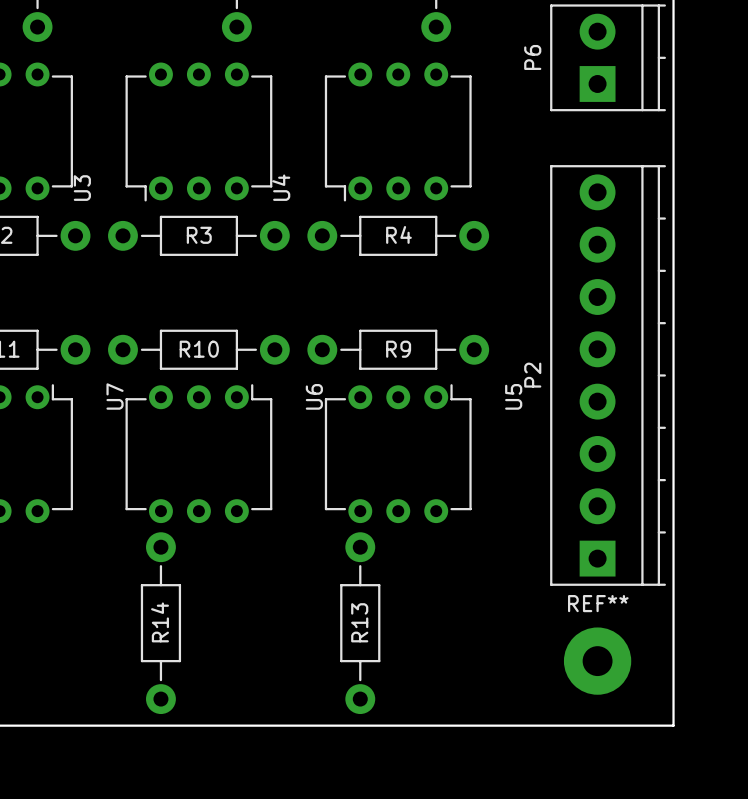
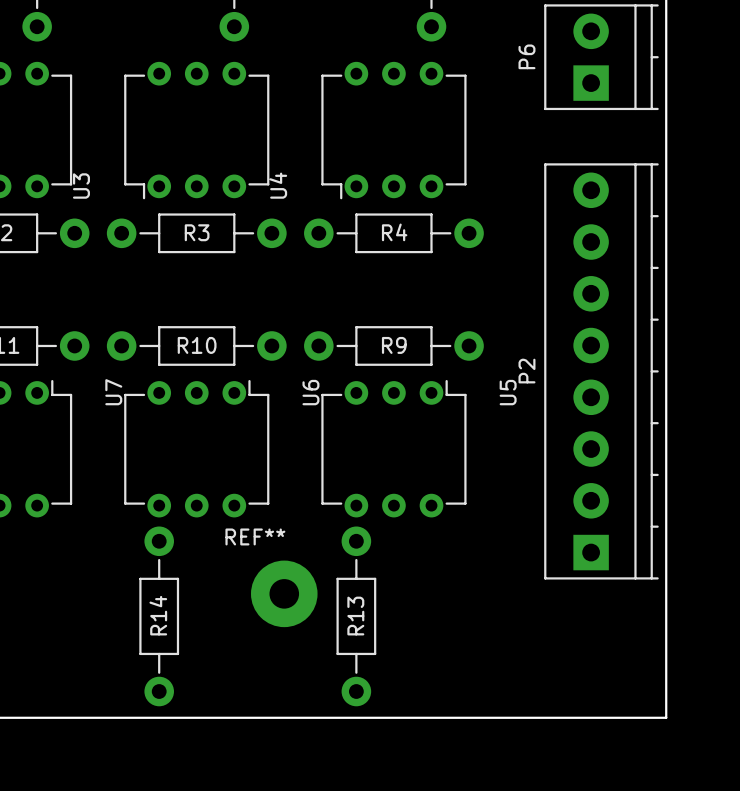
REF** name position: REF** (598, 603) -> REF** (255, 536)
REF** position: (597, 661) -> (284, 593)

